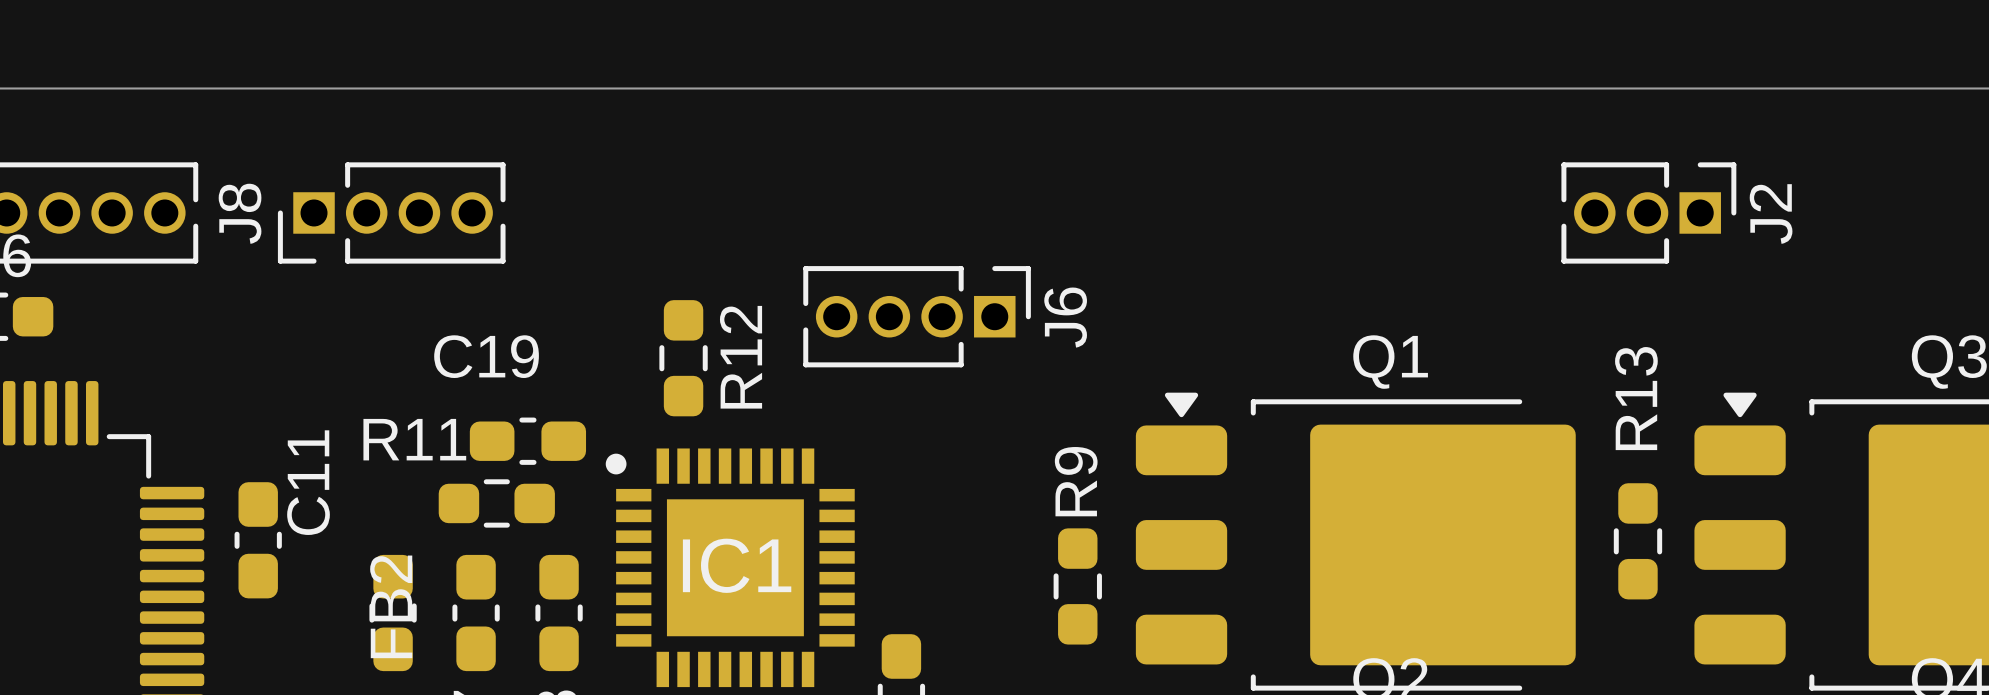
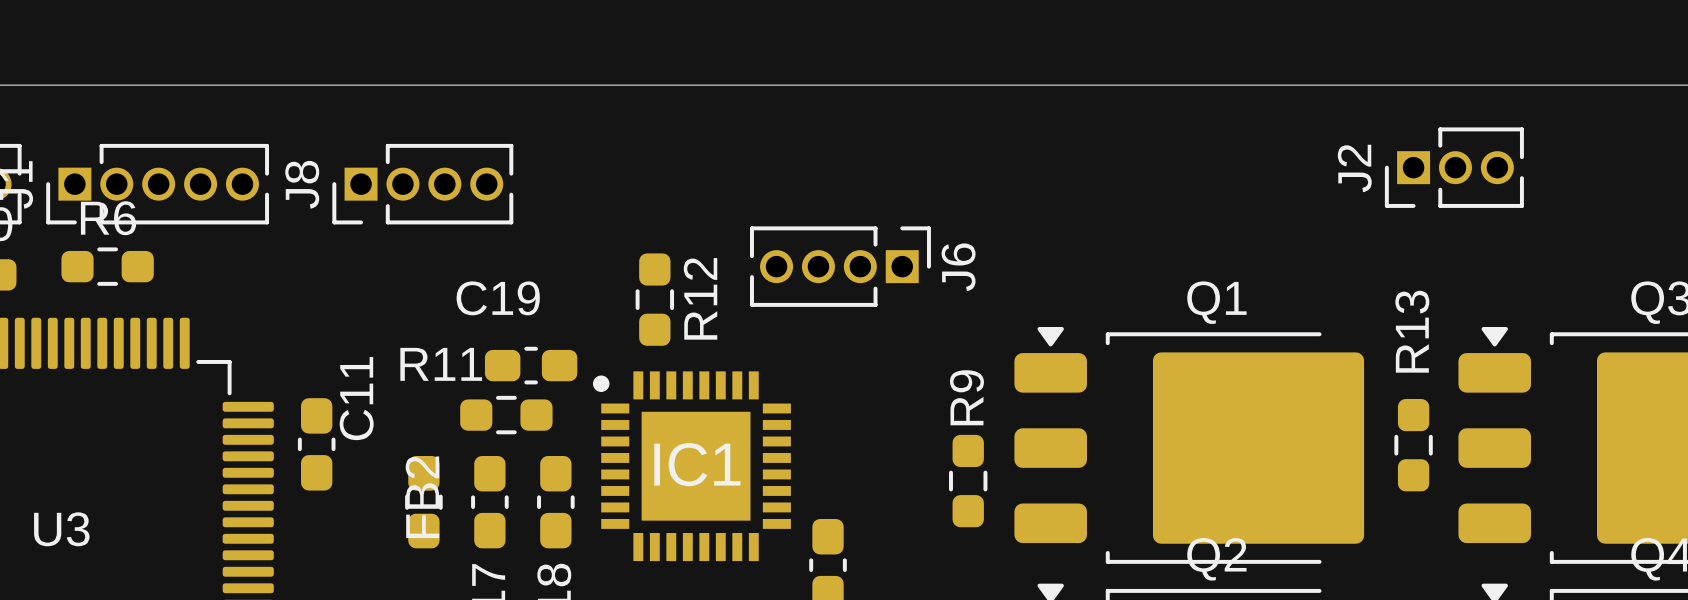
J2 rotation: 0° (1648, 212) -> 180° (1454, 167)

